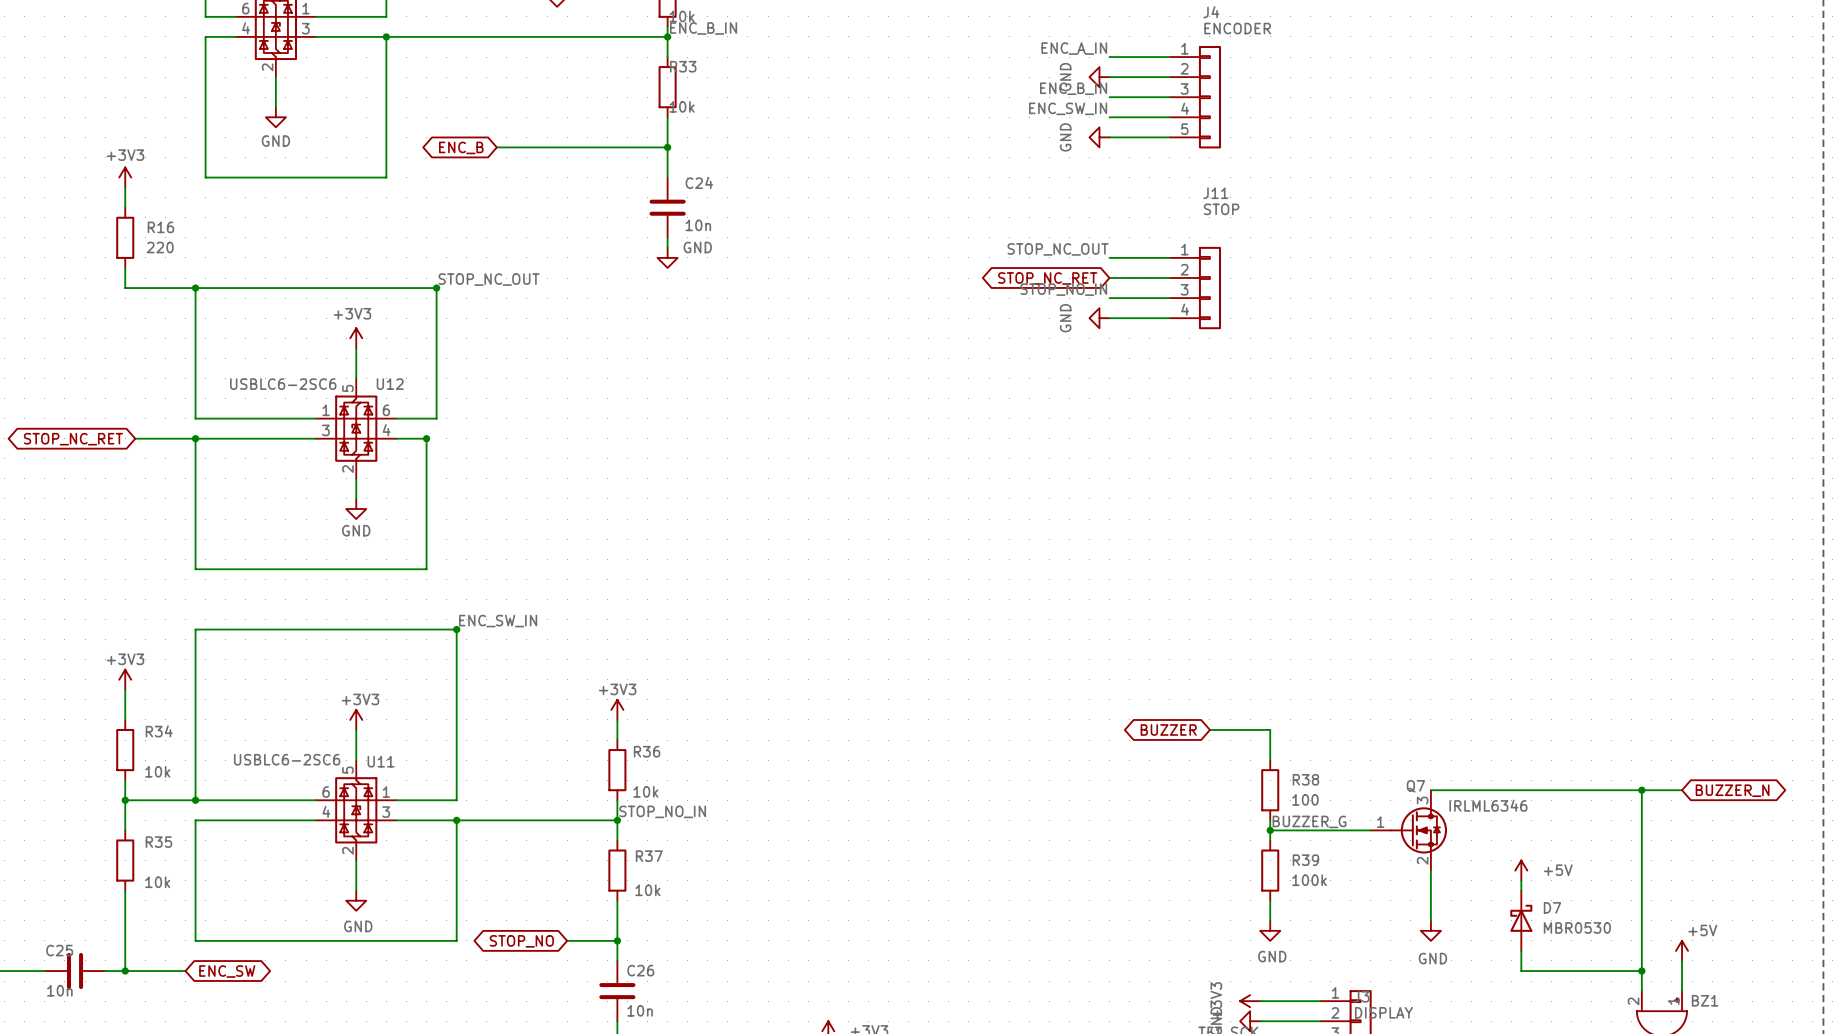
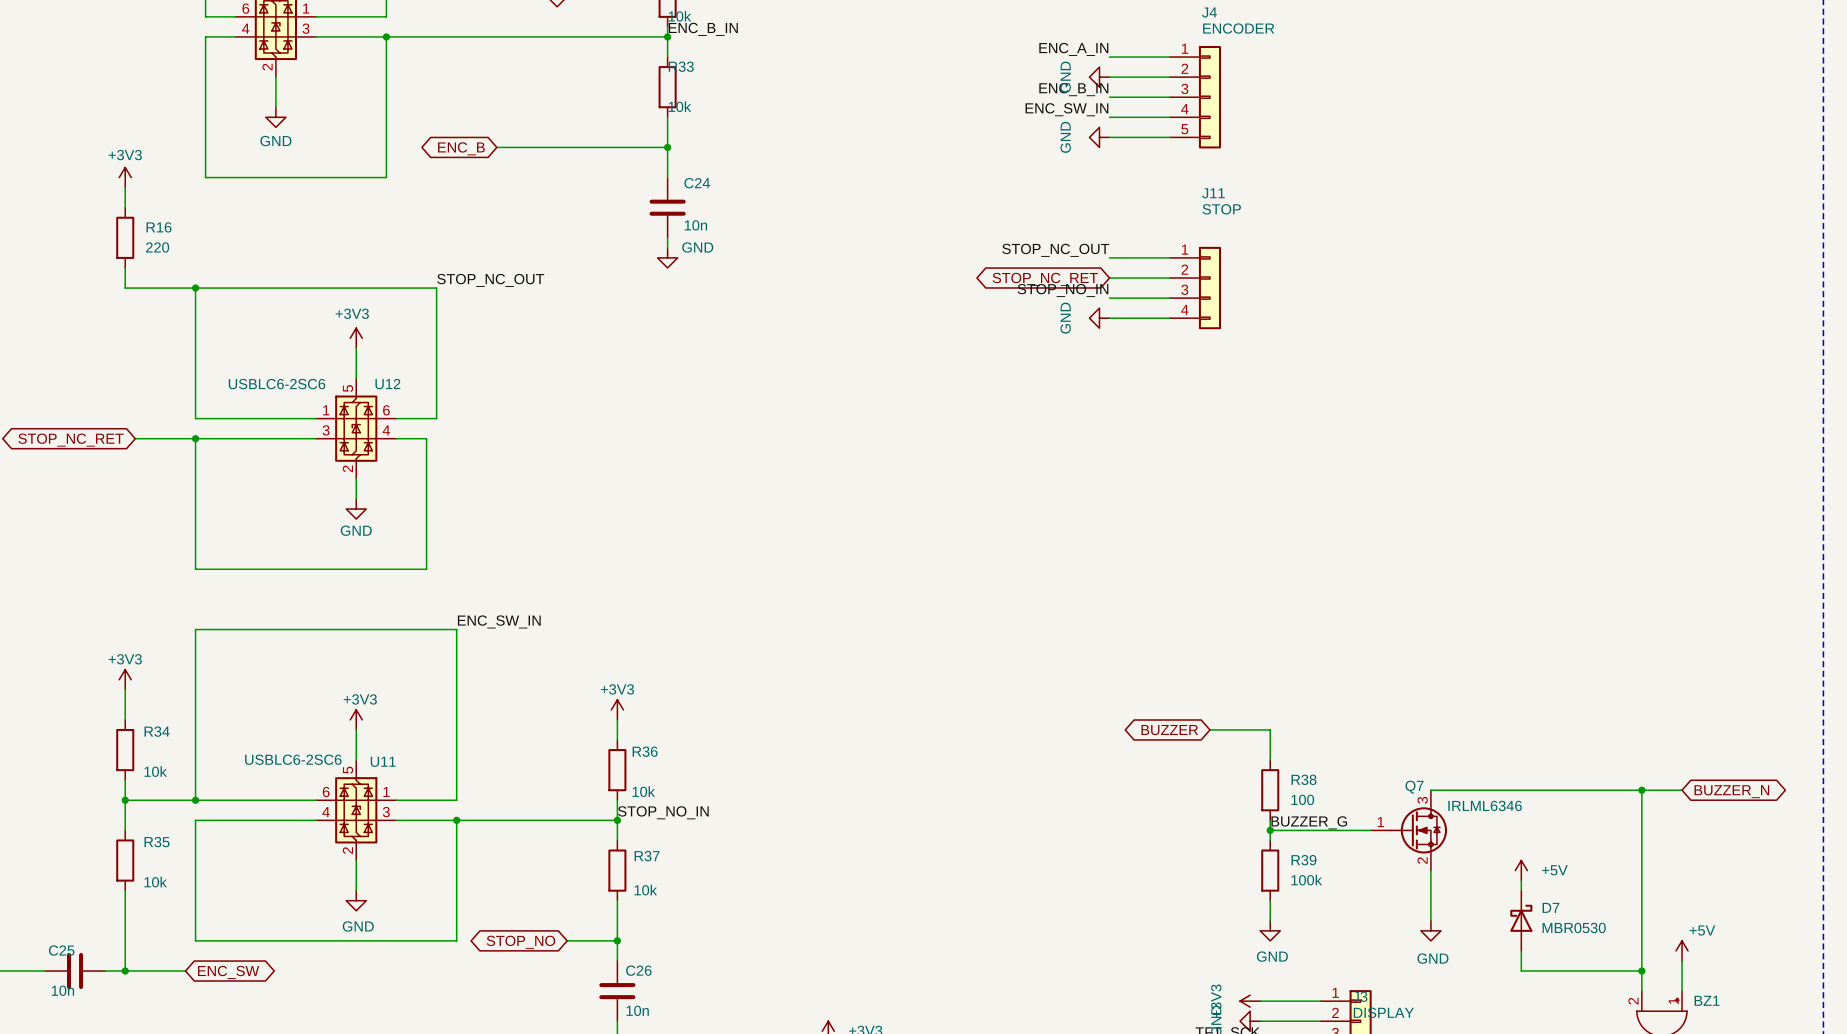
junction: (436, 288) -> none
junction: (426, 438) -> none
junction: (456, 629) -> none

